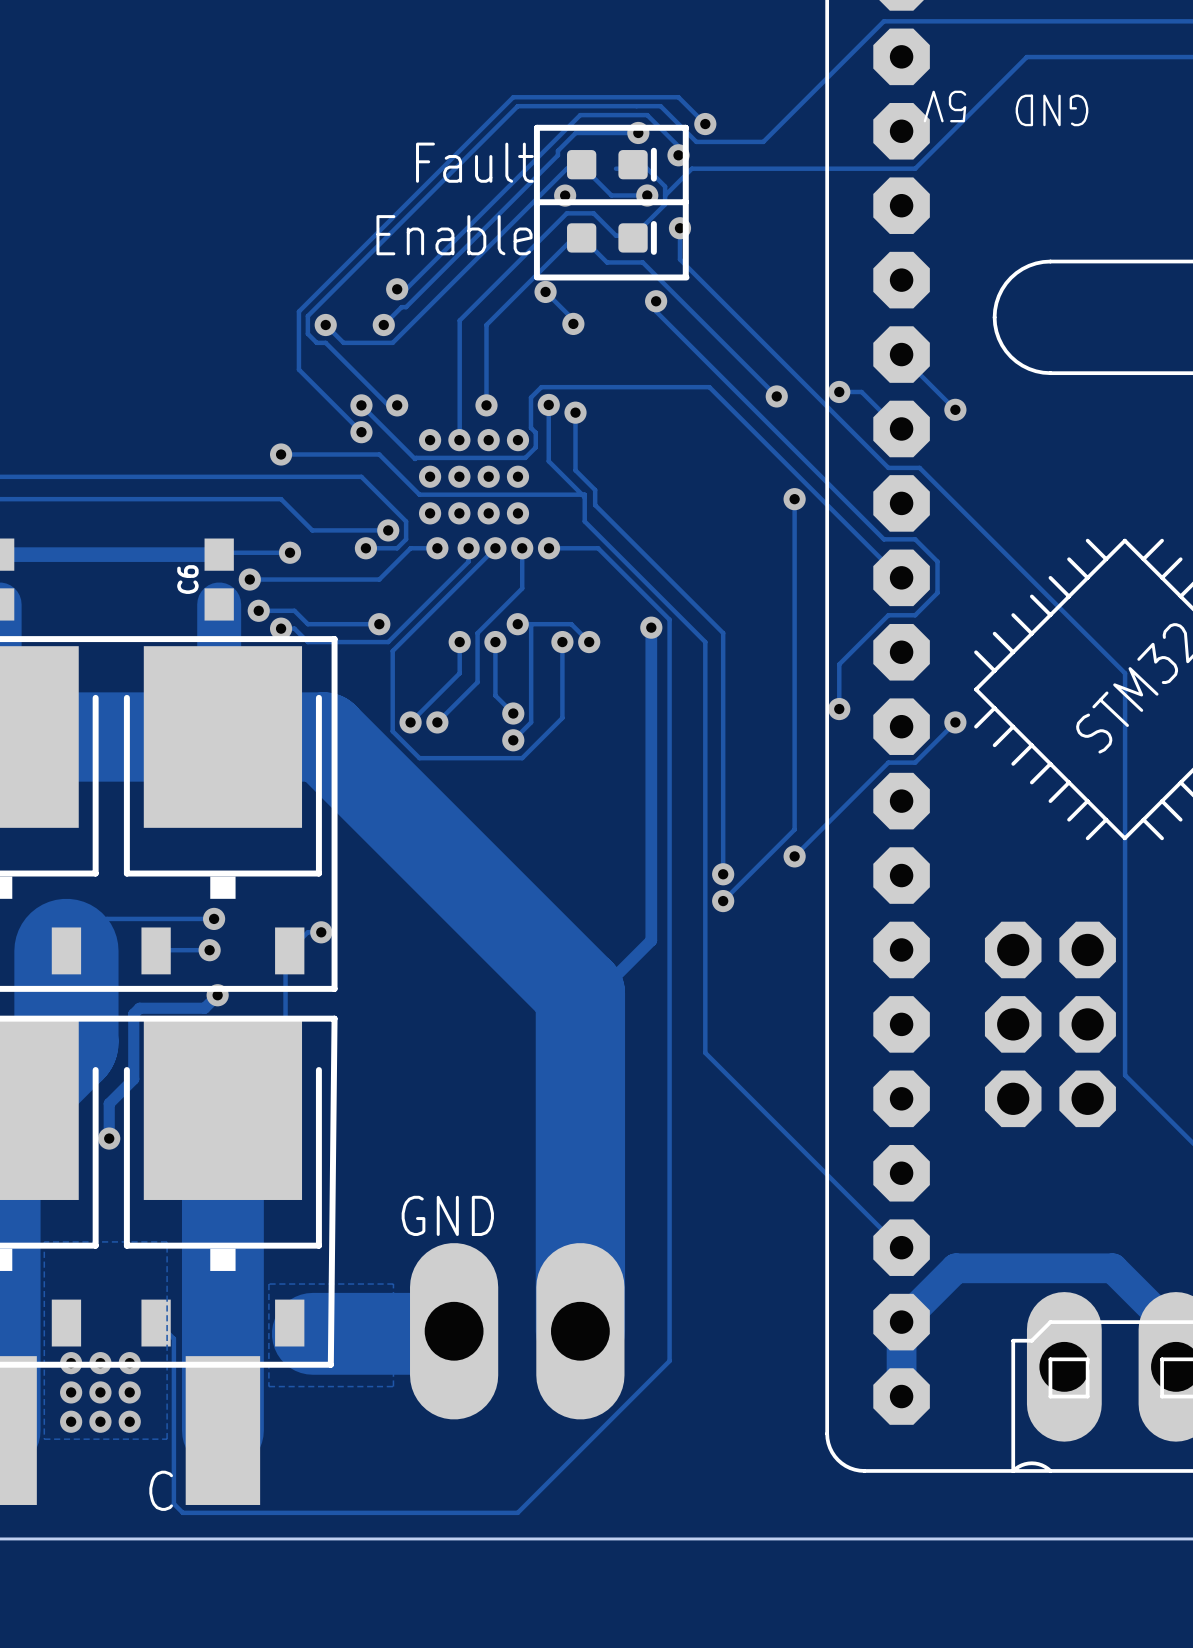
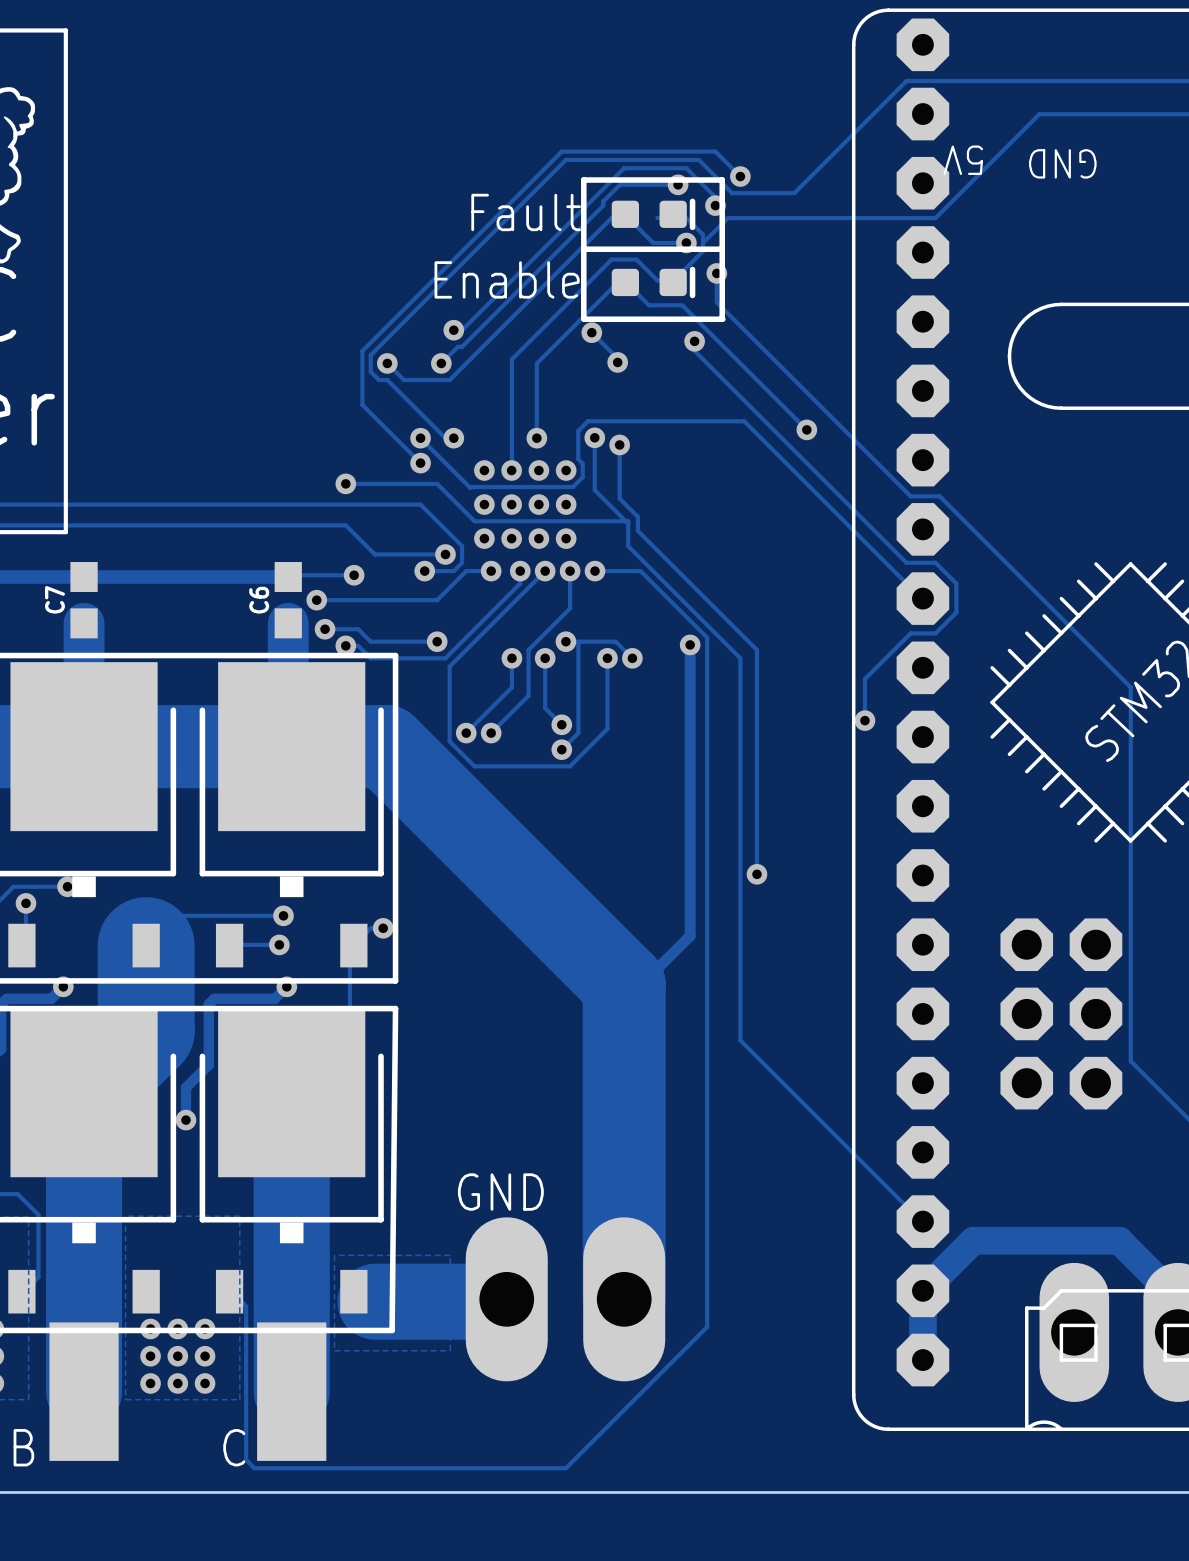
via: (565, 195) -> none
track: (901, 354) (955, 409) -> none
track: (839, 391) (861, 391) (897, 427) (901, 428) -> none
via: (839, 391) -> none
via: (955, 409) -> none
track: (794, 499) (794, 829) (723, 901) -> none
via: (794, 499) -> none
track: (955, 722) (915, 762) (888, 762) (794, 856) -> none
via: (955, 722) -> none
via: (794, 856) -> none
via: (723, 901) -> none

